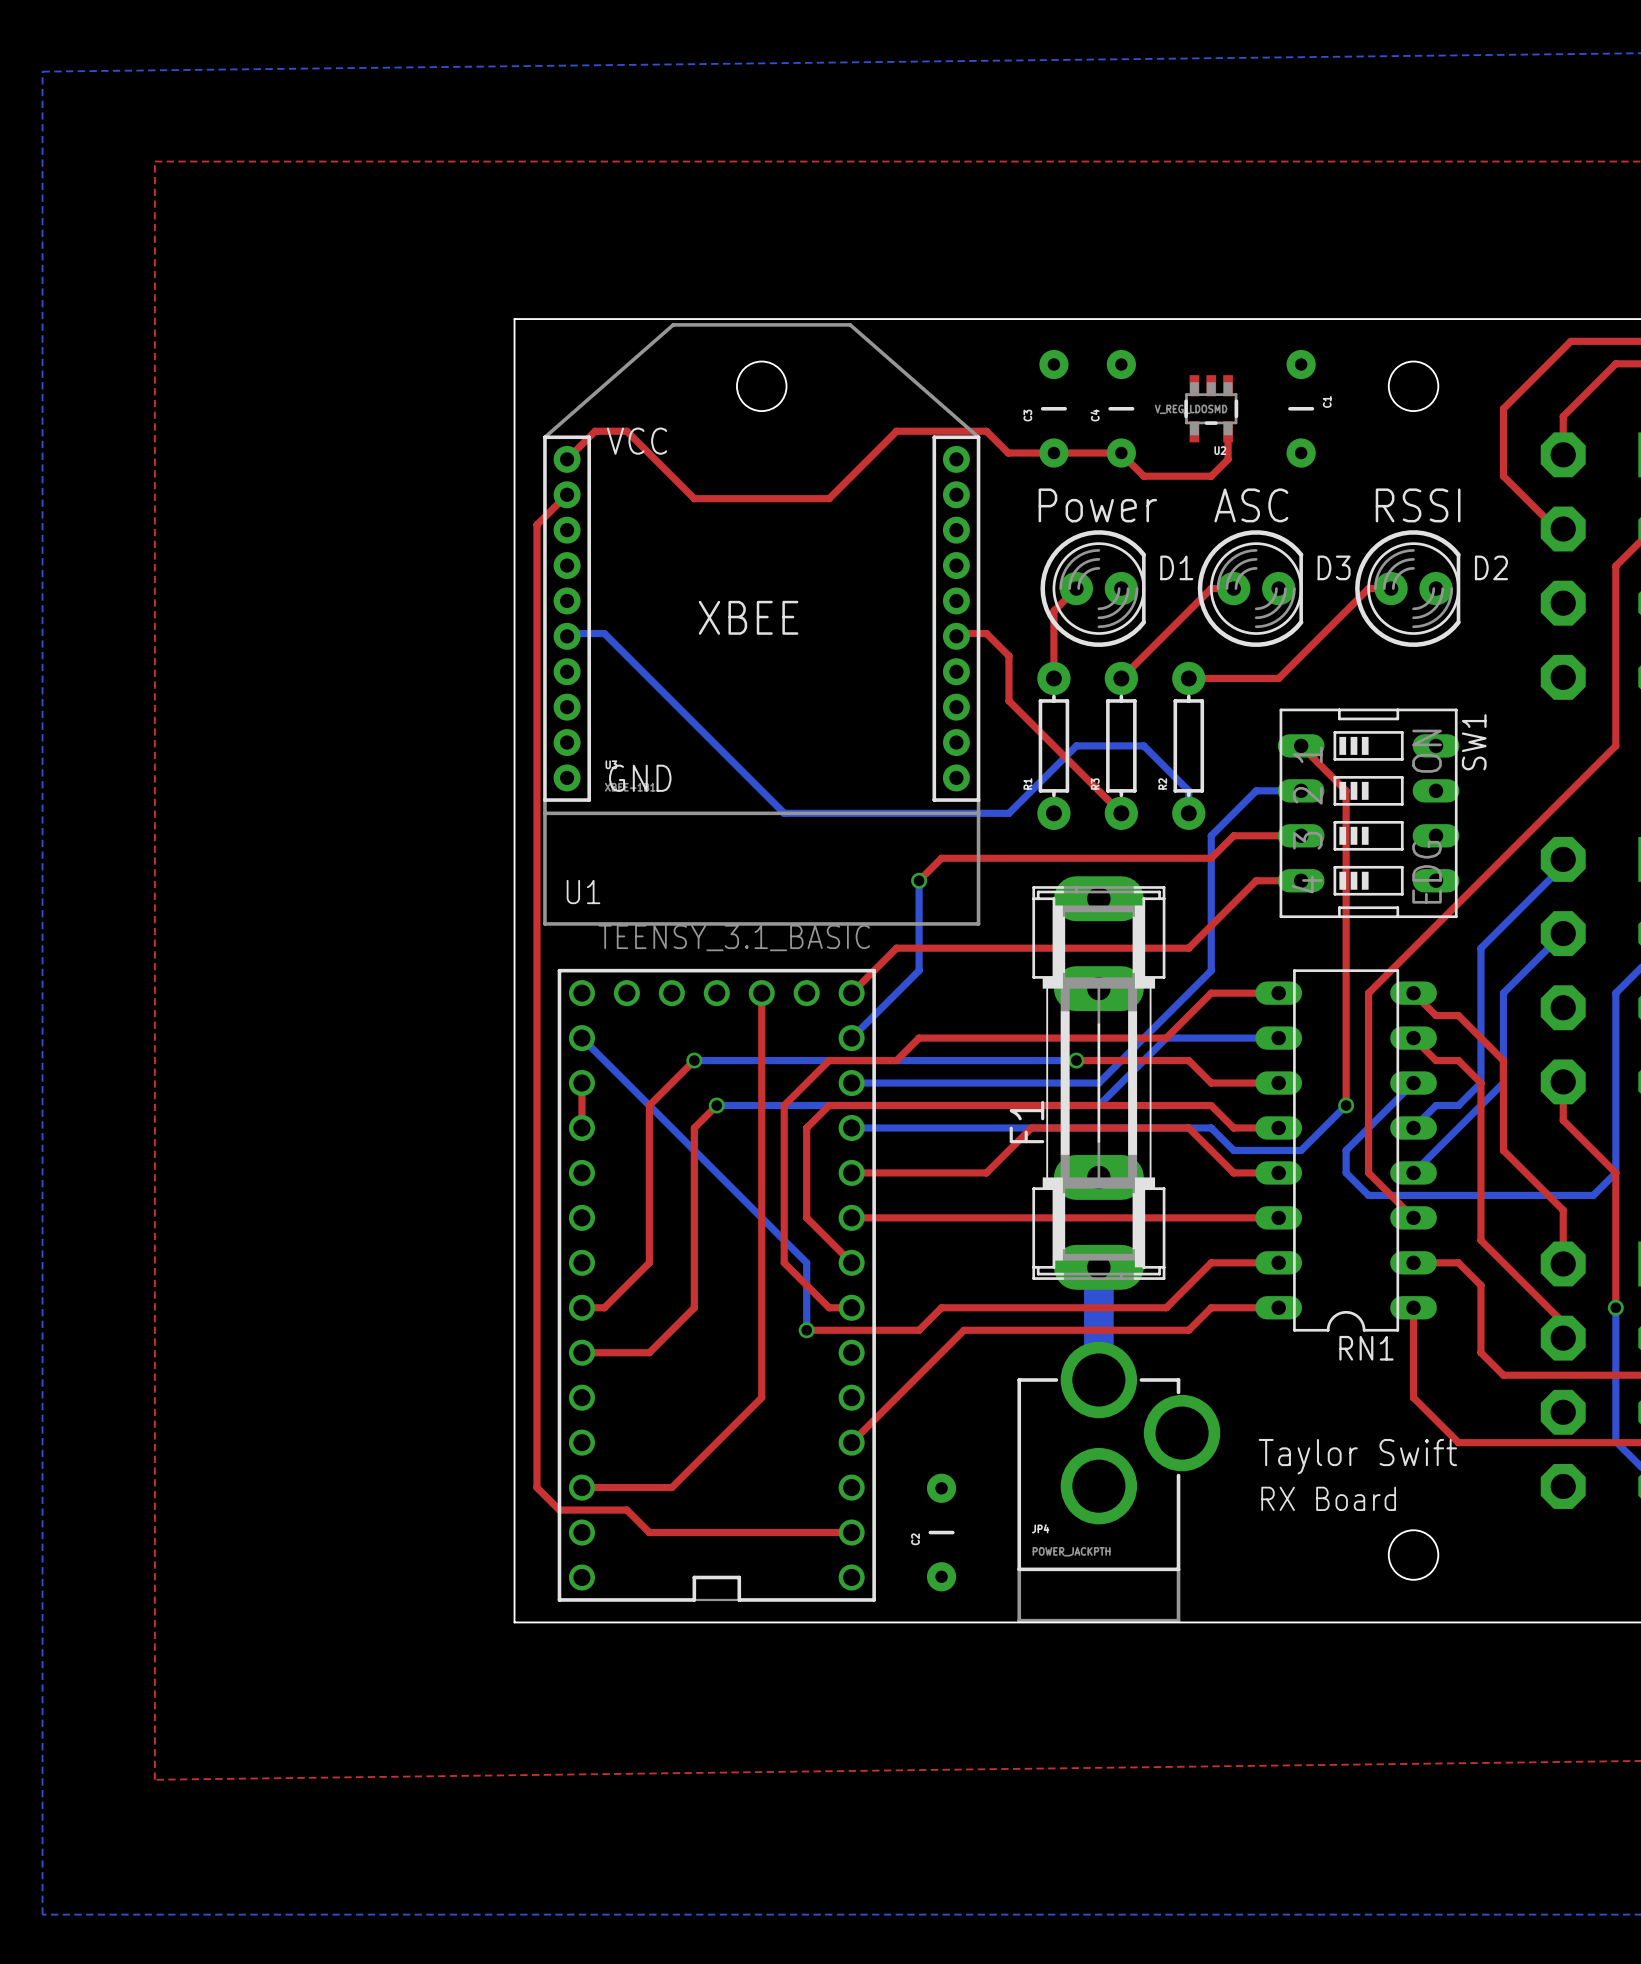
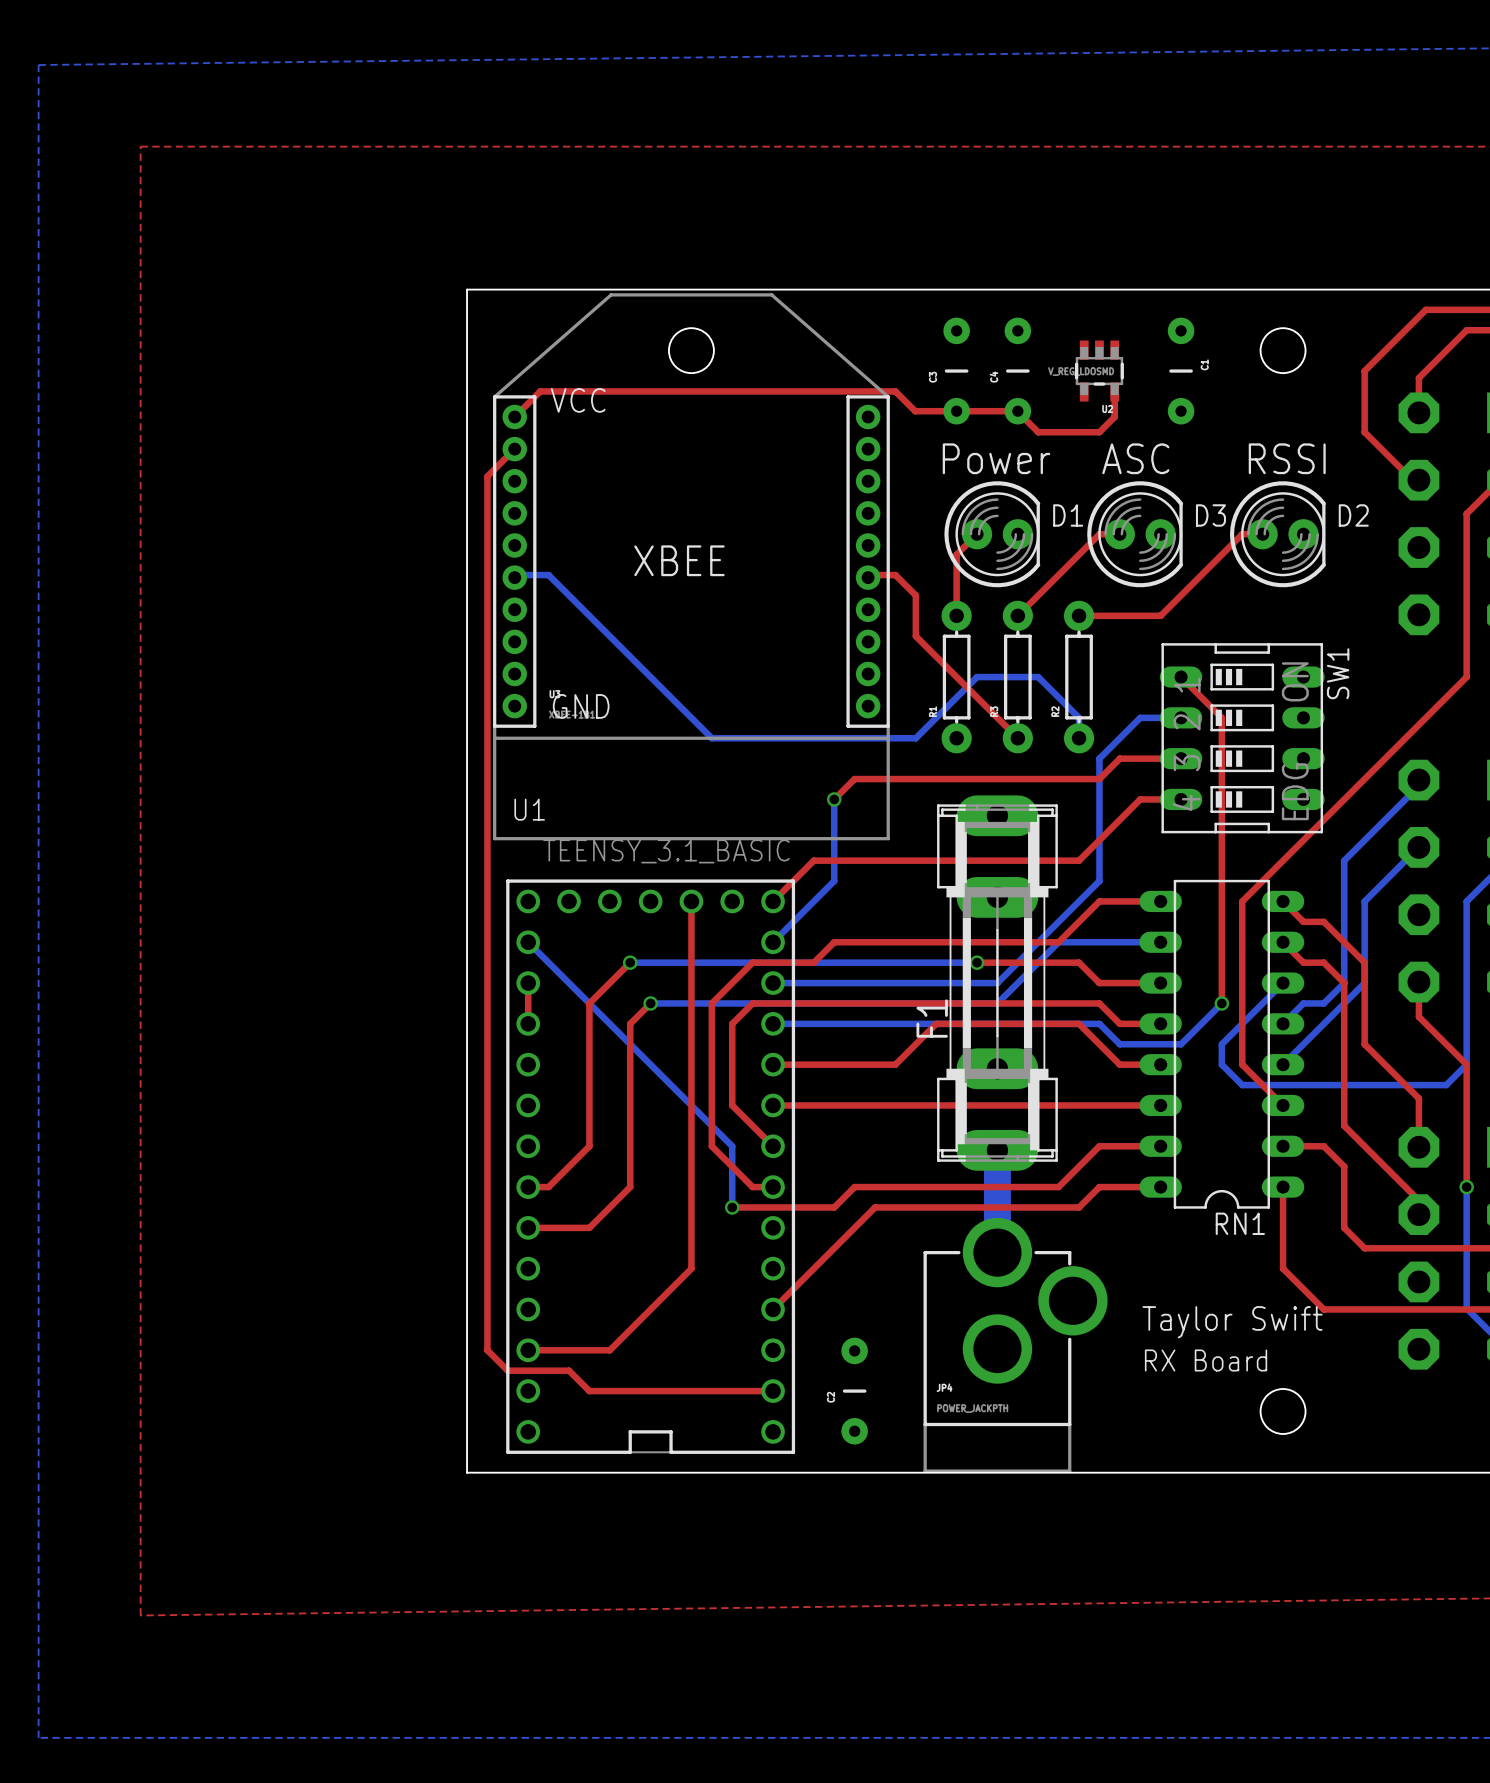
top track: (626, 431) (694, 498) (829, 498) (896, 431) -> (569, 391) (813, 391)

